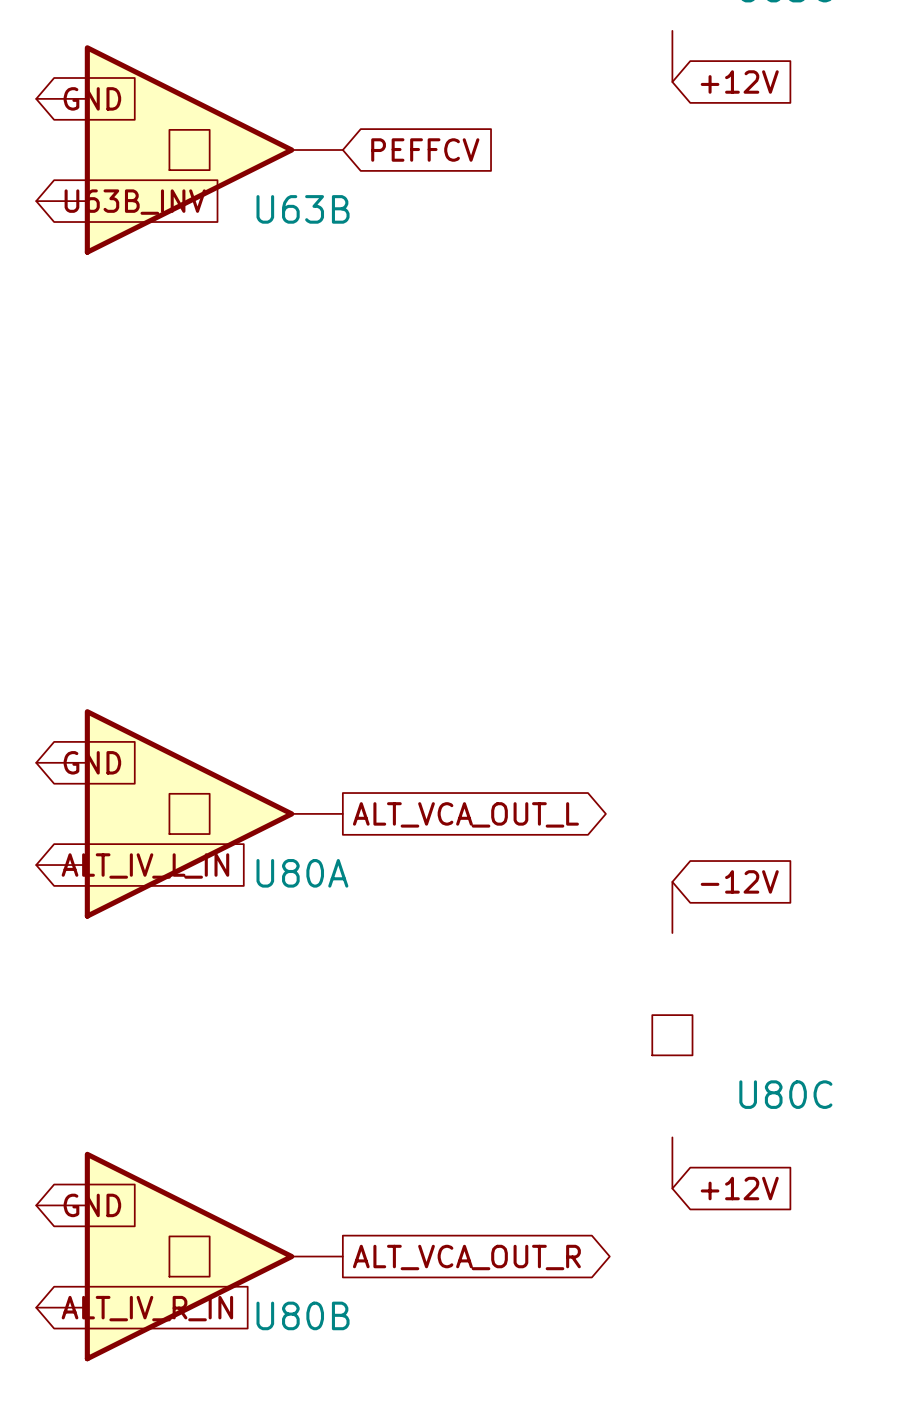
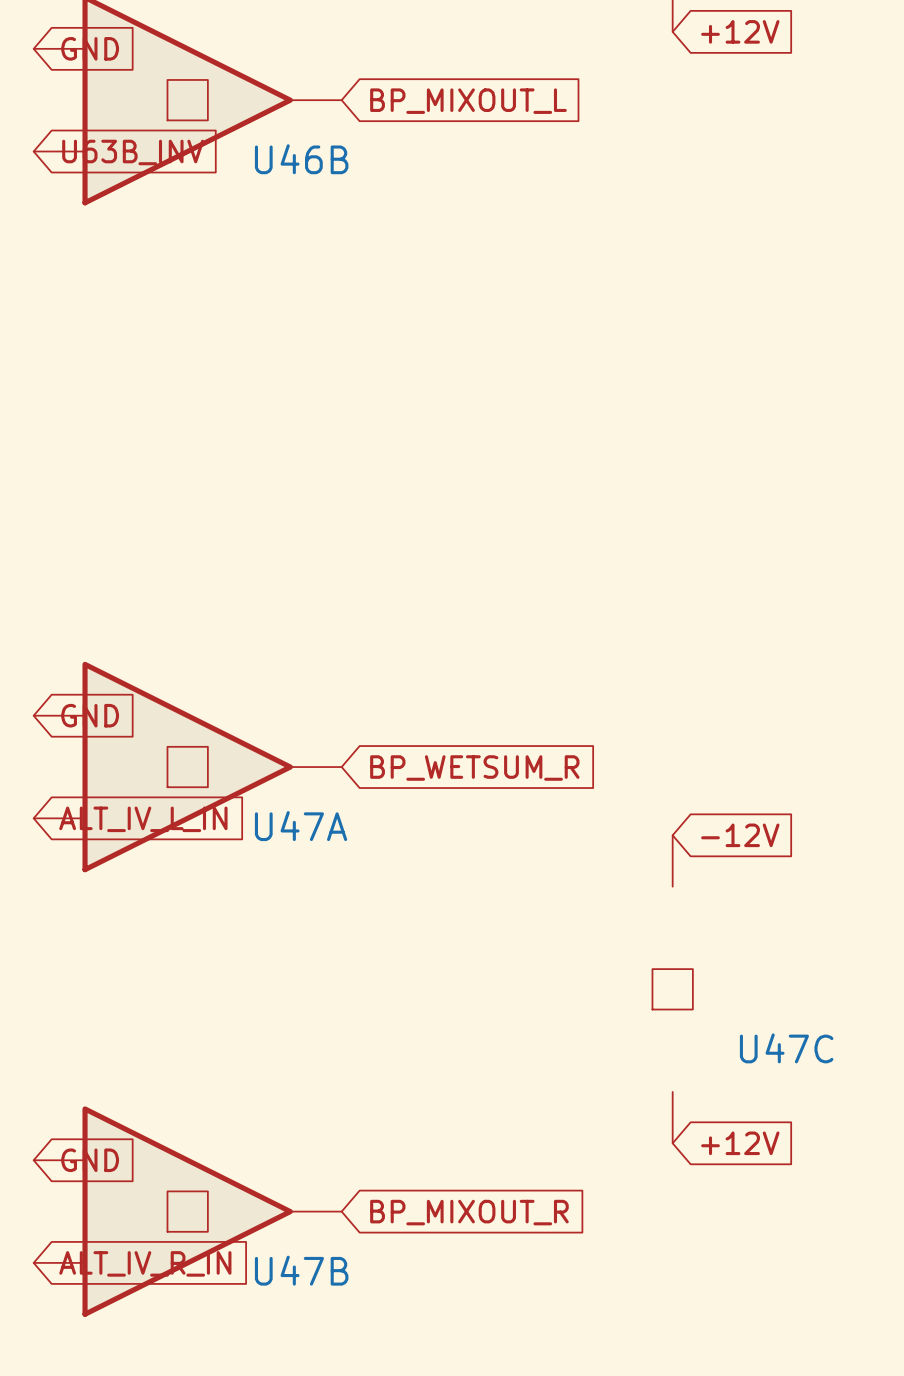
global label: PEFFCV (425, 150) -> BP_MIXOUT_L (468, 101)
U63B name: U63B (303, 209) -> U46B (301, 159)
global label shape: output (465, 814) -> input (474, 768)
global label: ALT_VCA_OUT_L (465, 814) -> BP_WETSUM_R (474, 768)
U80A name: U80A (302, 873) -> U47A (301, 826)
U80C name: U80C (785, 1094) -> U47C (786, 1048)
global label shape: output (466, 1257) -> input (469, 1212)
global label: ALT_VCA_OUT_R (466, 1257) -> BP_MIXOUT_R (469, 1212)
U80B name: U80B (303, 1315) -> U47B (301, 1270)

